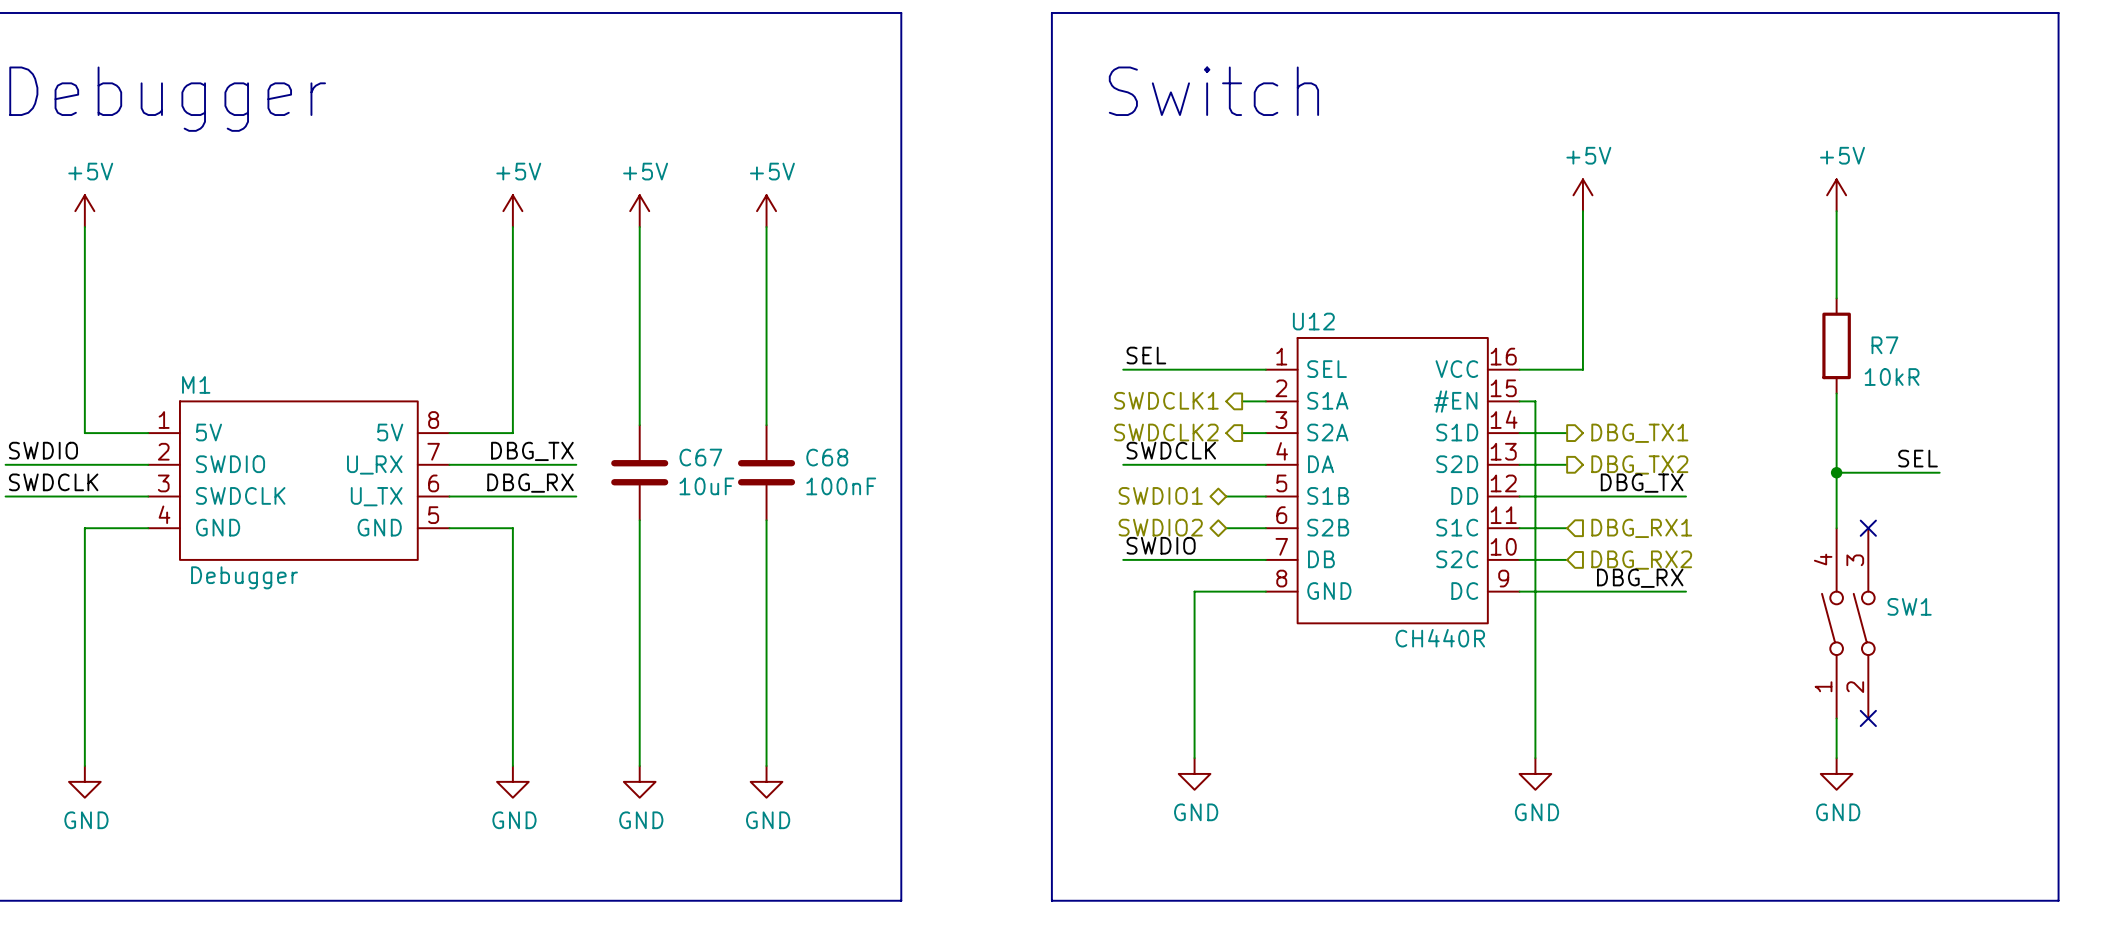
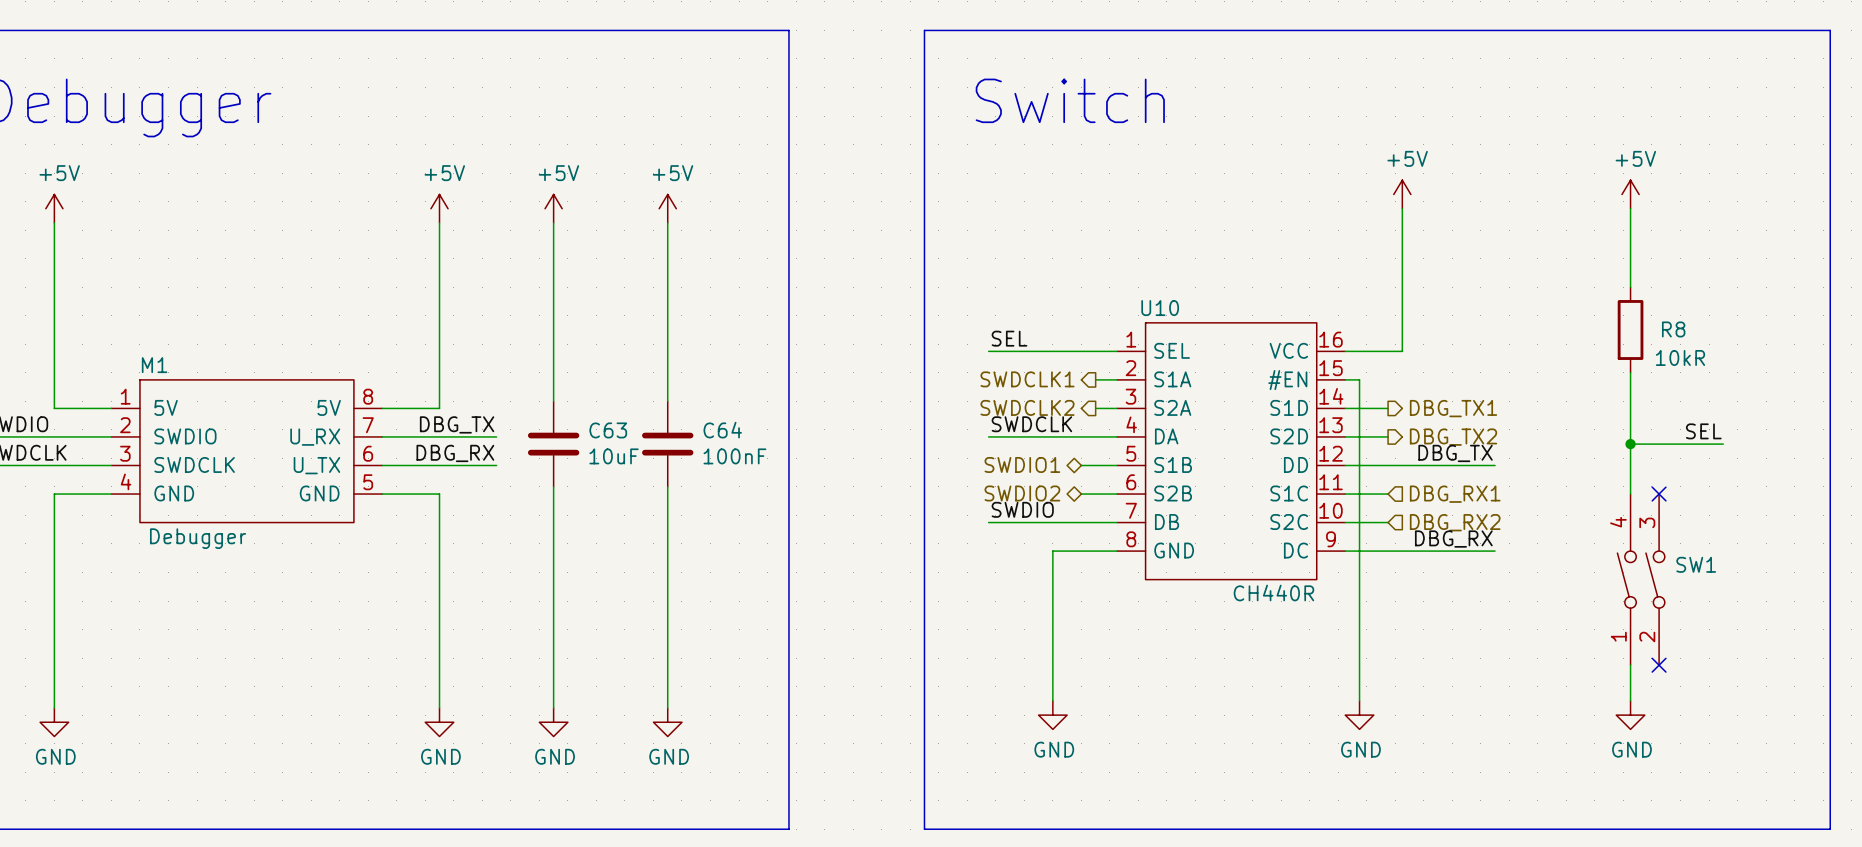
U12 name: U12 (1313, 321) -> U10 (1160, 308)
R7 name: R7 (1884, 345) -> R8 (1673, 329)
C67 name: C67 (700, 457) -> C63 (608, 430)
C68 name: C68 (827, 457) -> C64 (722, 430)

